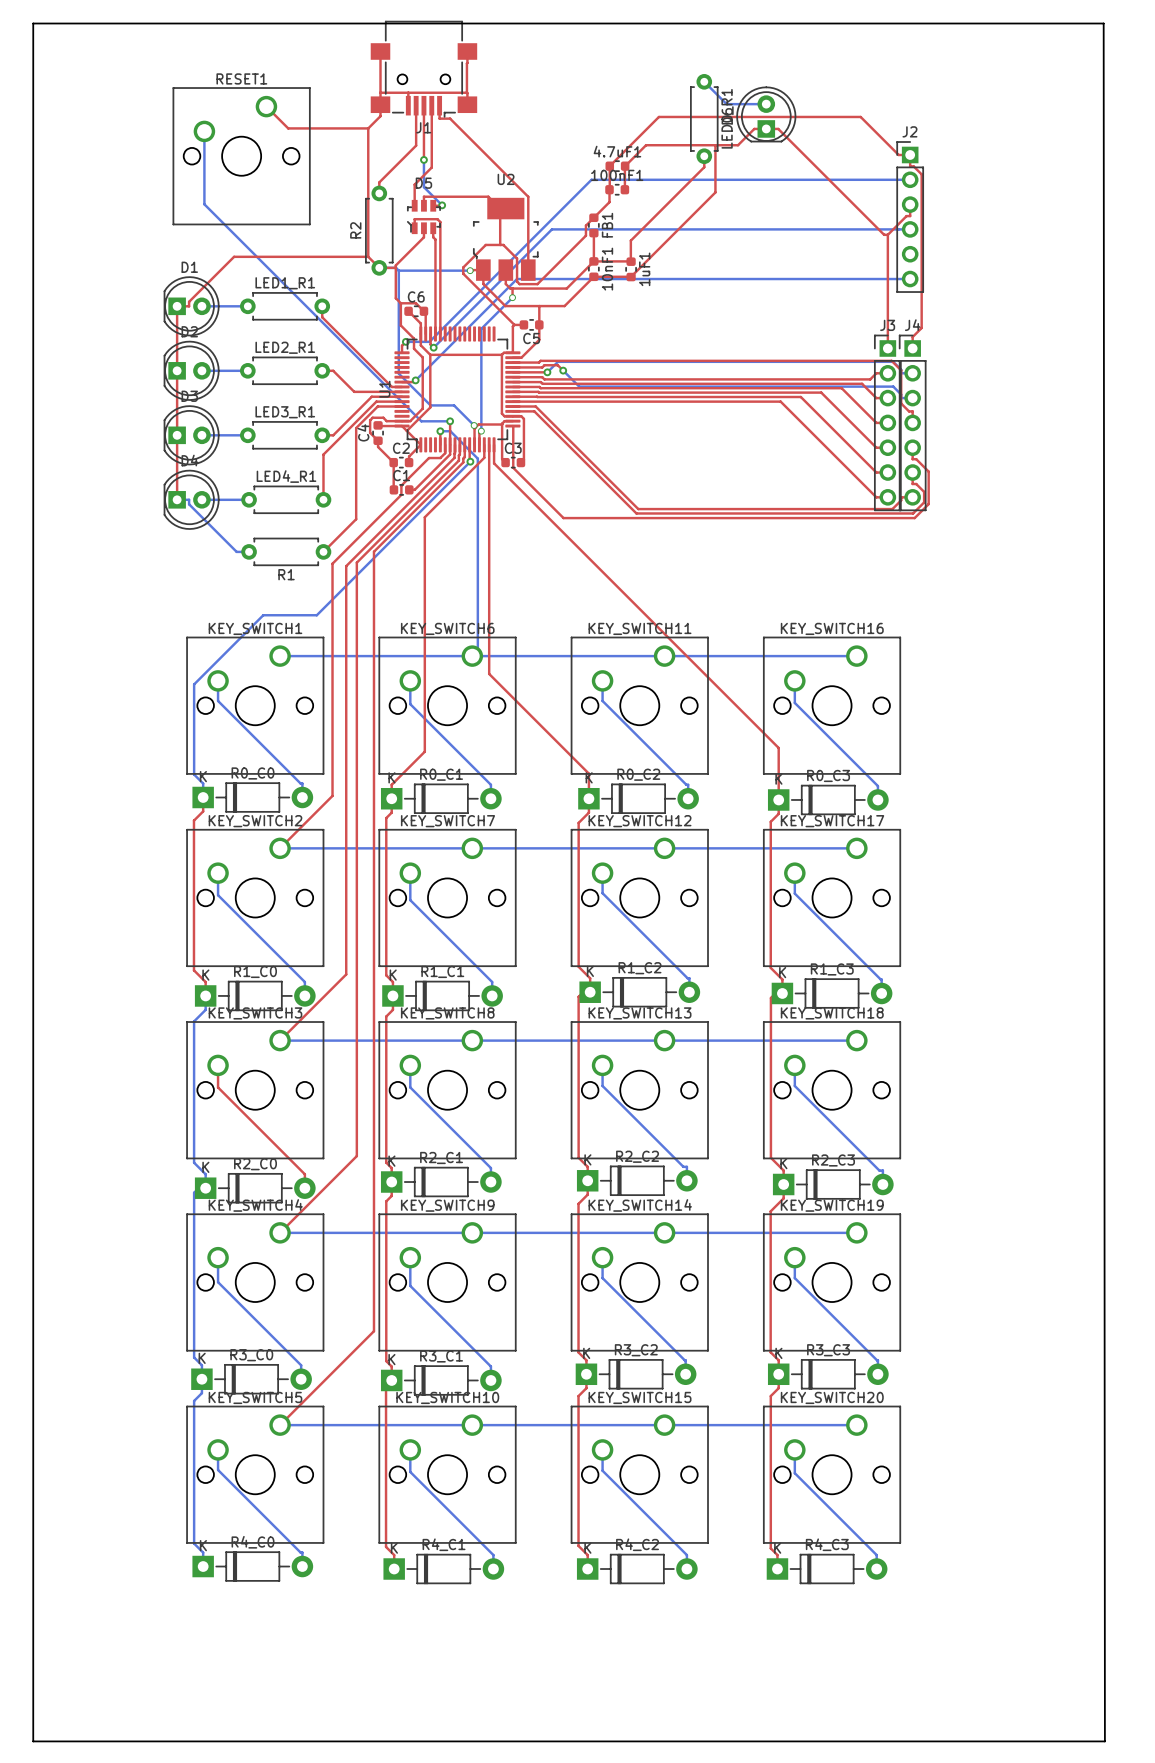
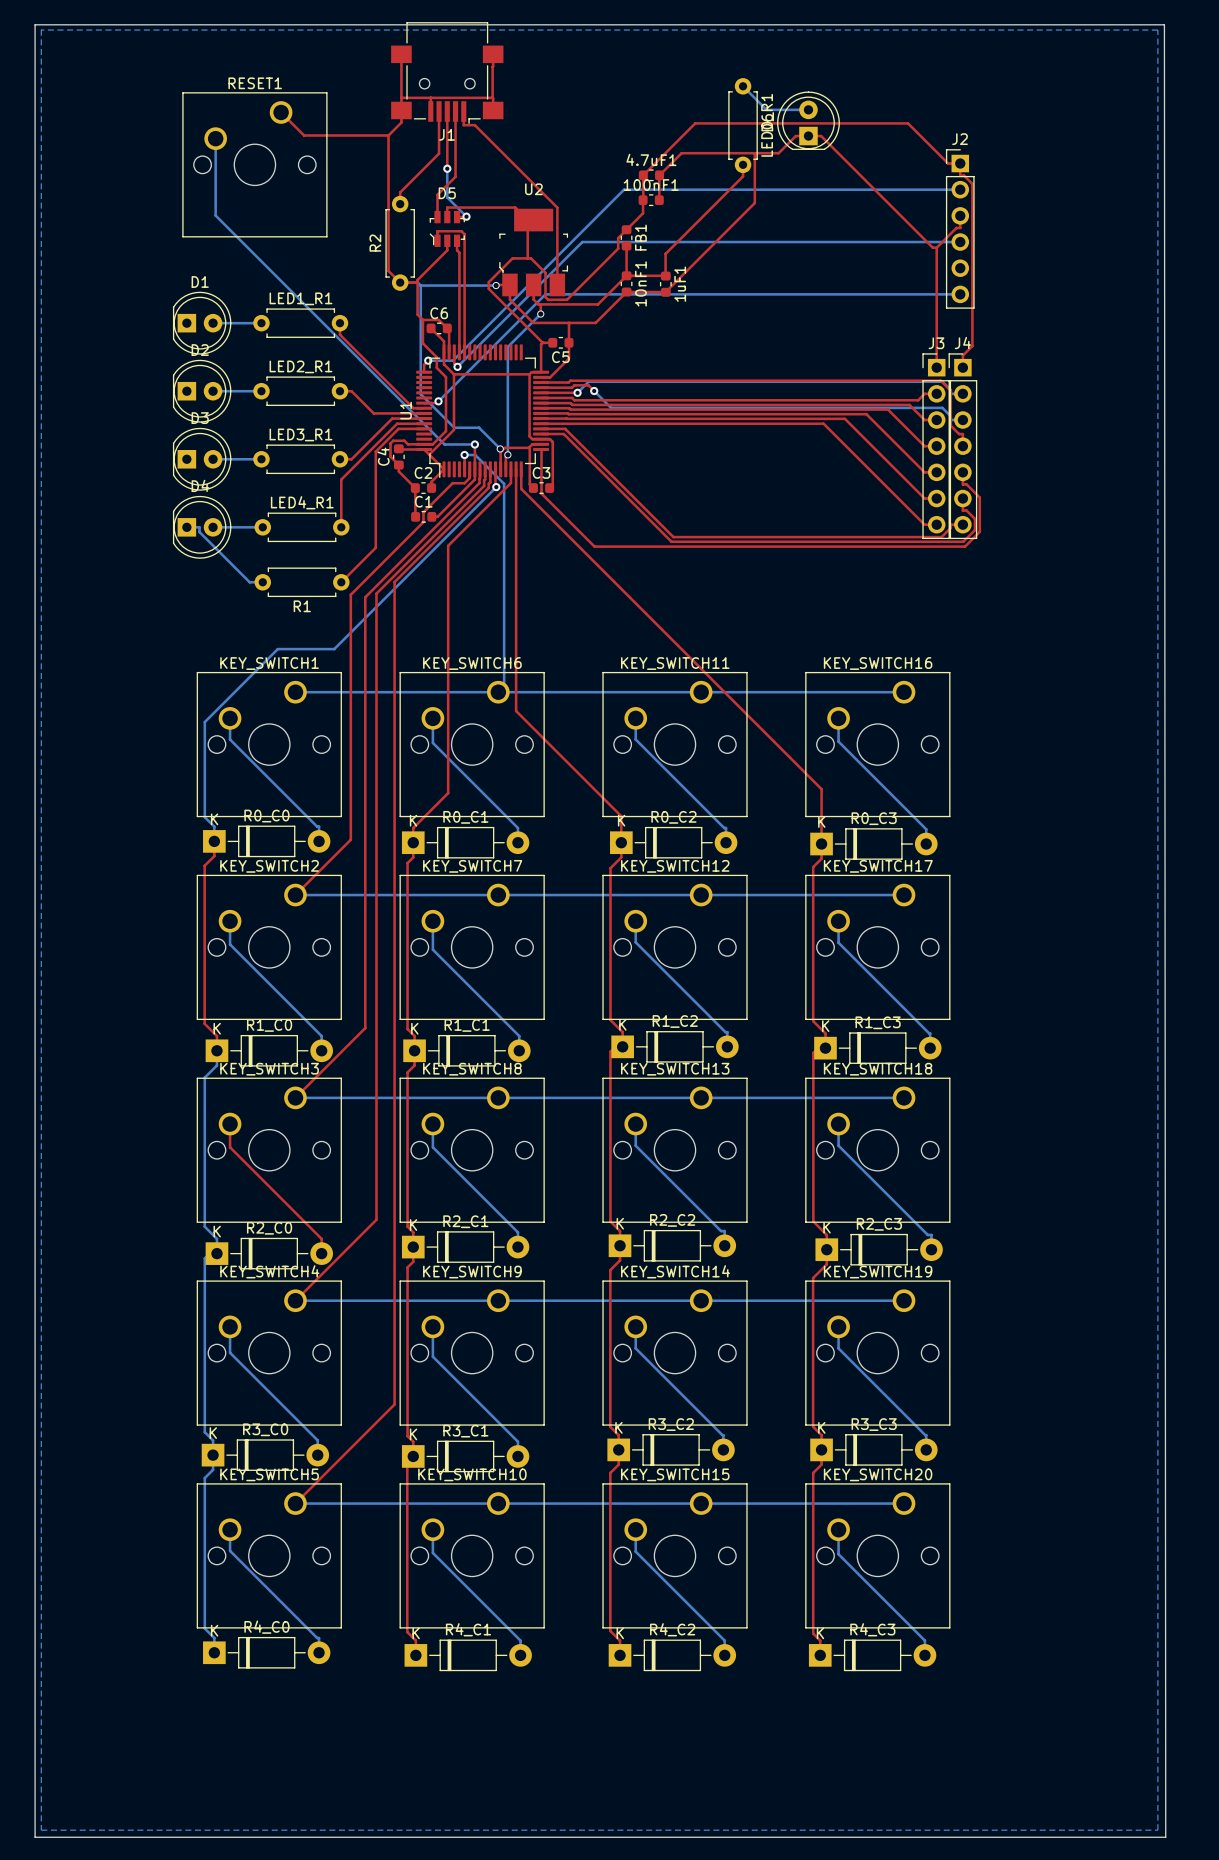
bottom zone outline: none -> (41, 29) (41, 1830) (1157, 1830) (1157, 30) (41, 29)
top track: (368, 256) (234, 256) (189, 301) (189, 306) (177, 306) (177, 499) -> none

